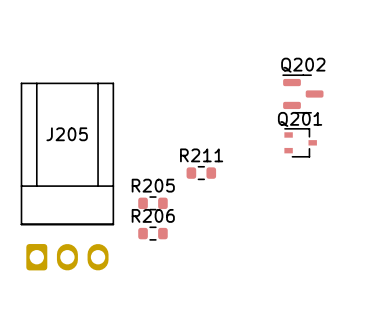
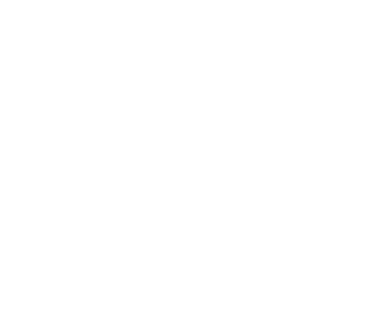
Q202: (302, 93) -> none
Q201: (300, 142) -> none
R211: (201, 173) -> none
J205: (67, 176) -> none
R205: (152, 203) -> none
R206: (152, 233) -> none

